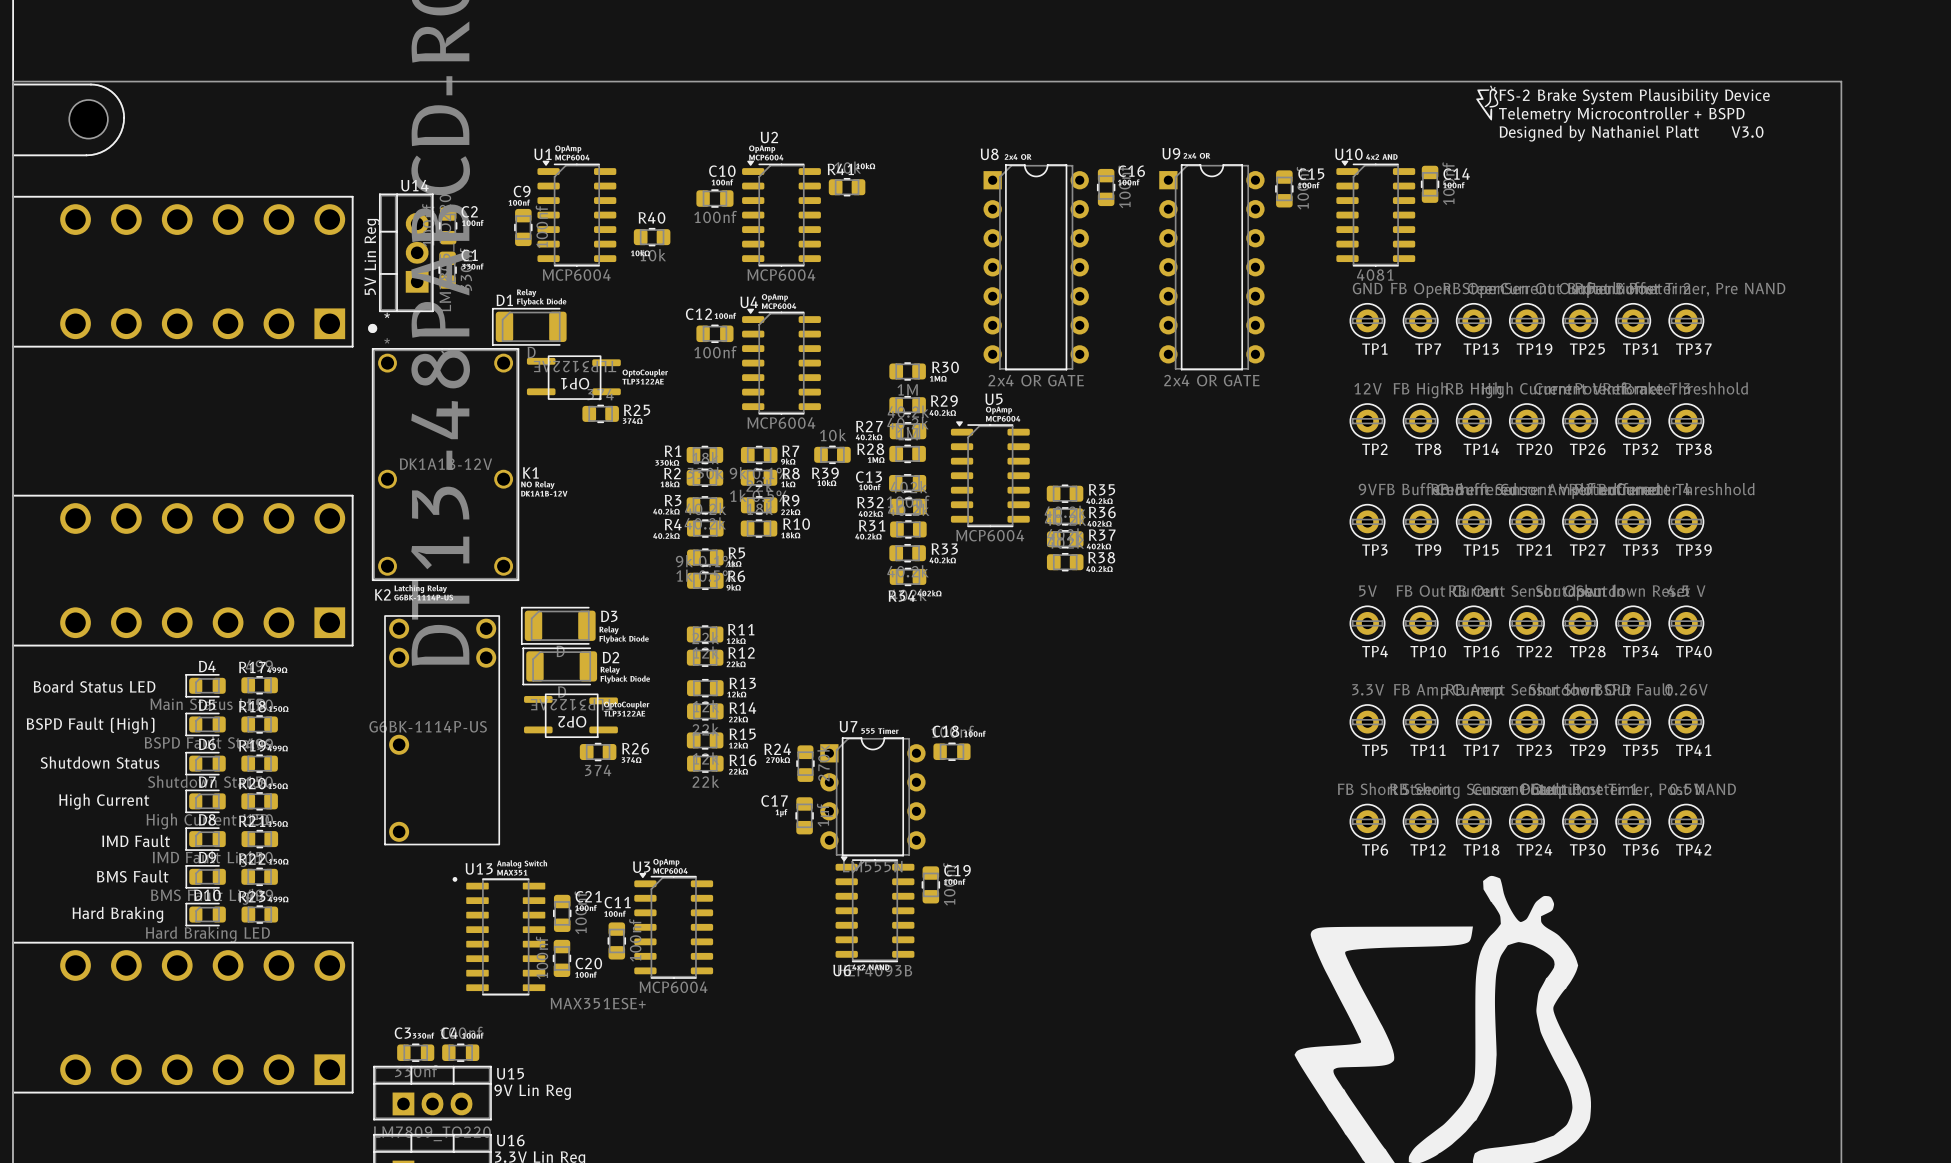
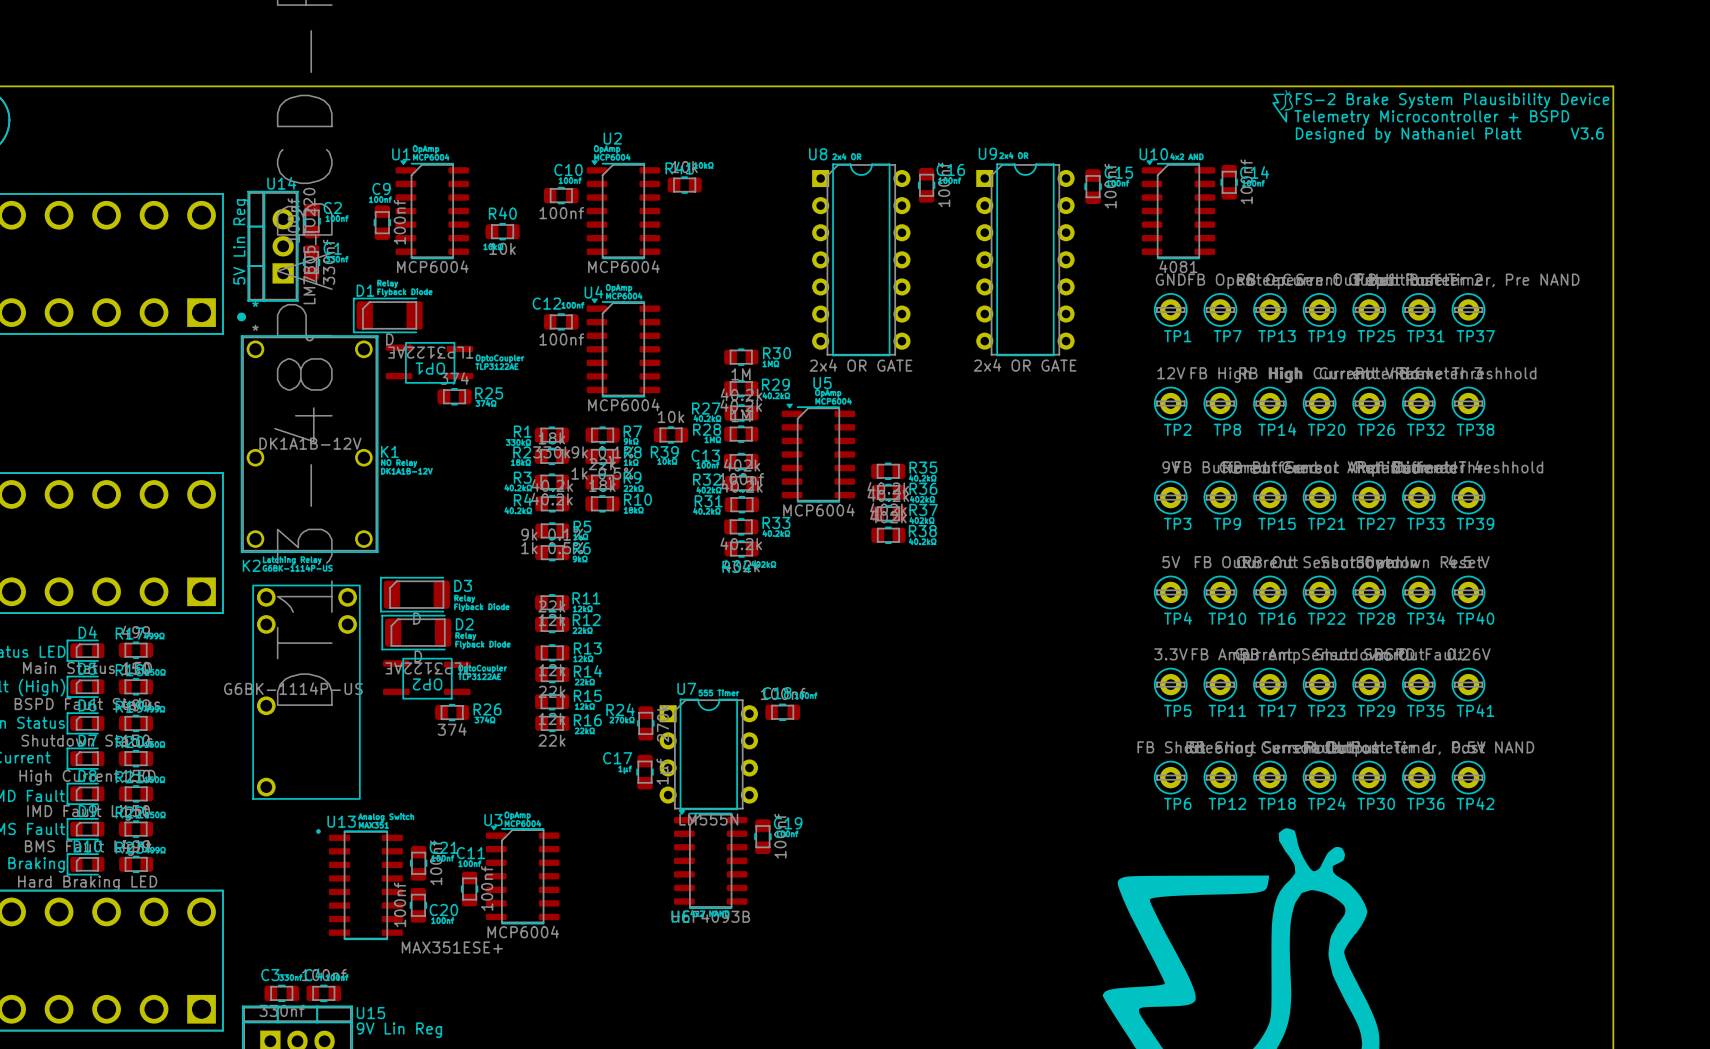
text: Designed by Nathaniel Platt V3.0 (1631, 133) -> Designed by Nathaniel Platt V3.6 (1449, 135)

